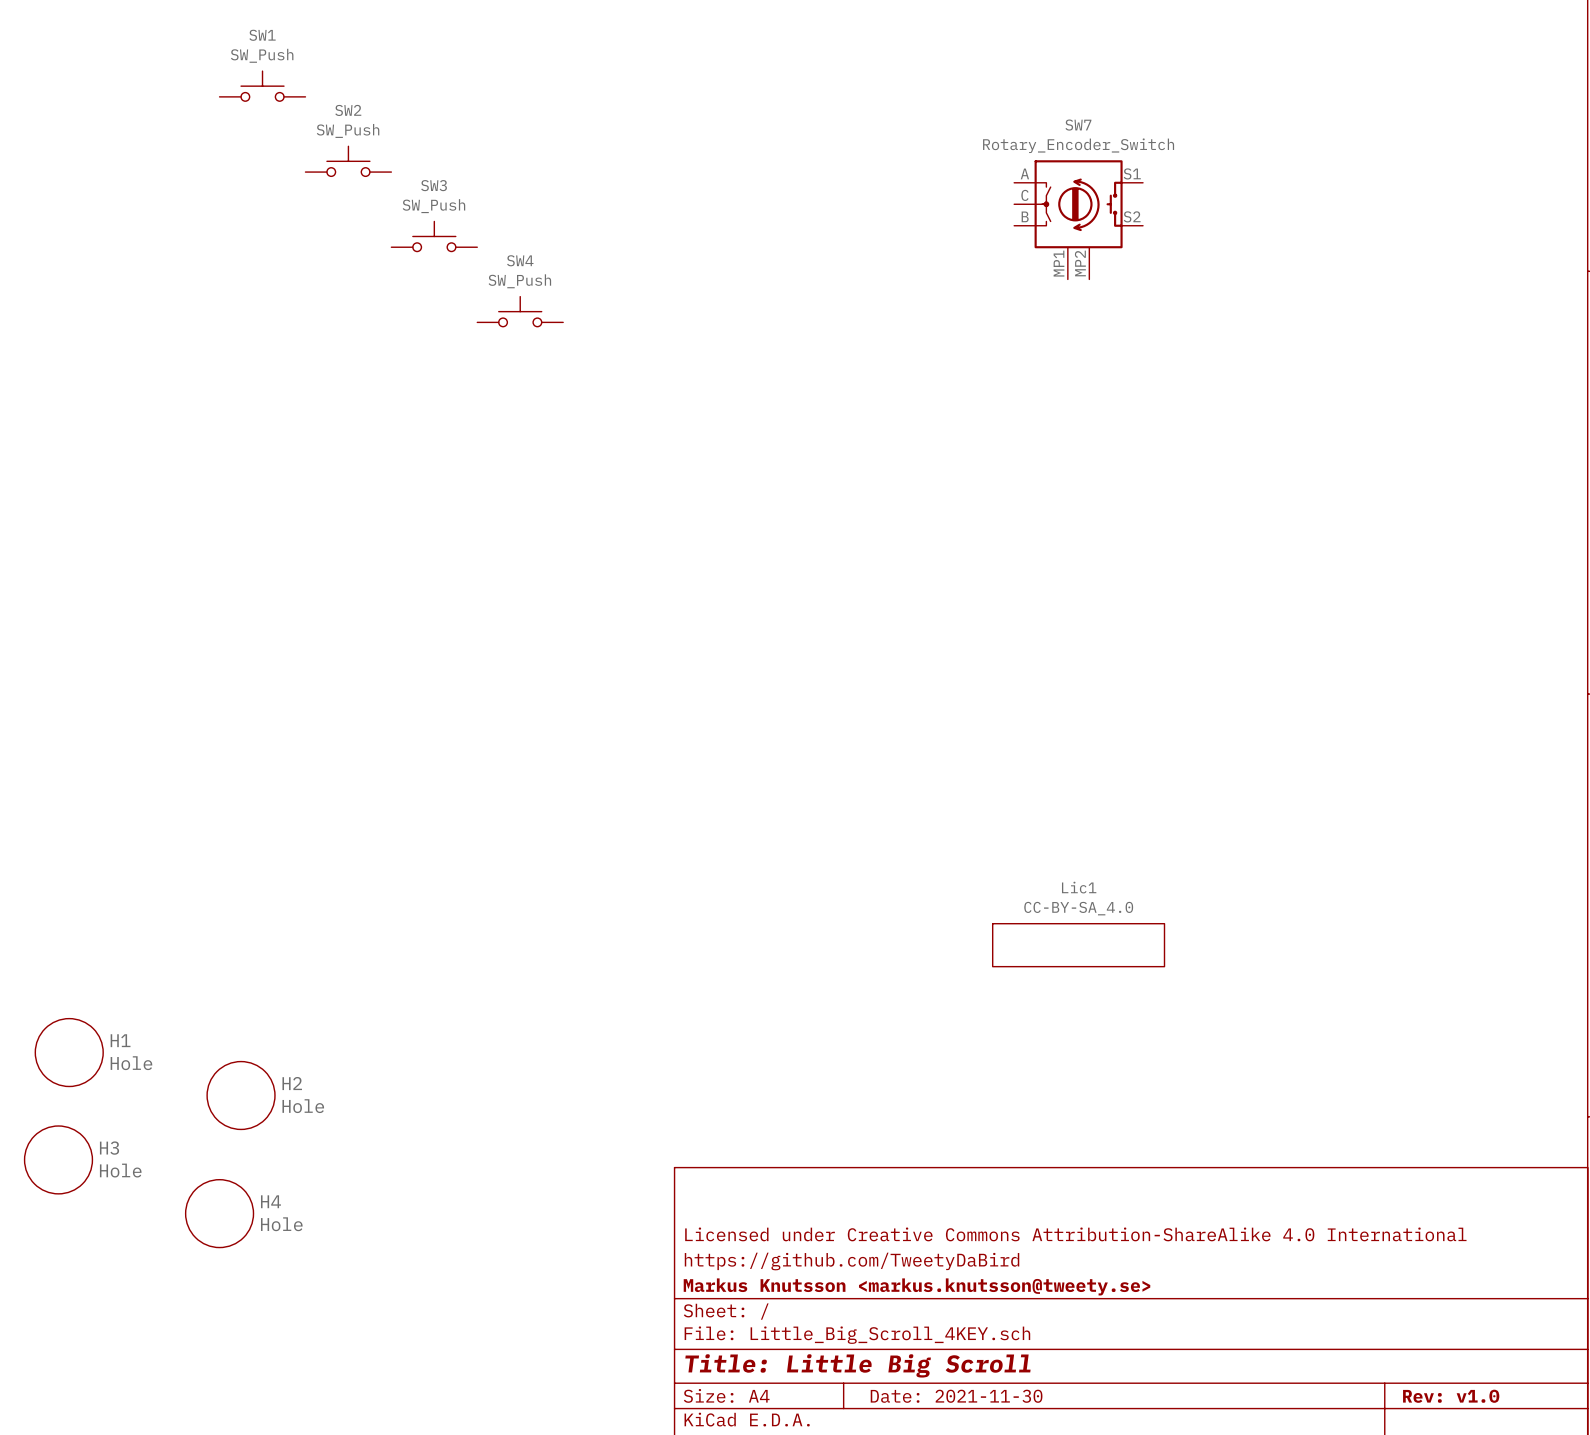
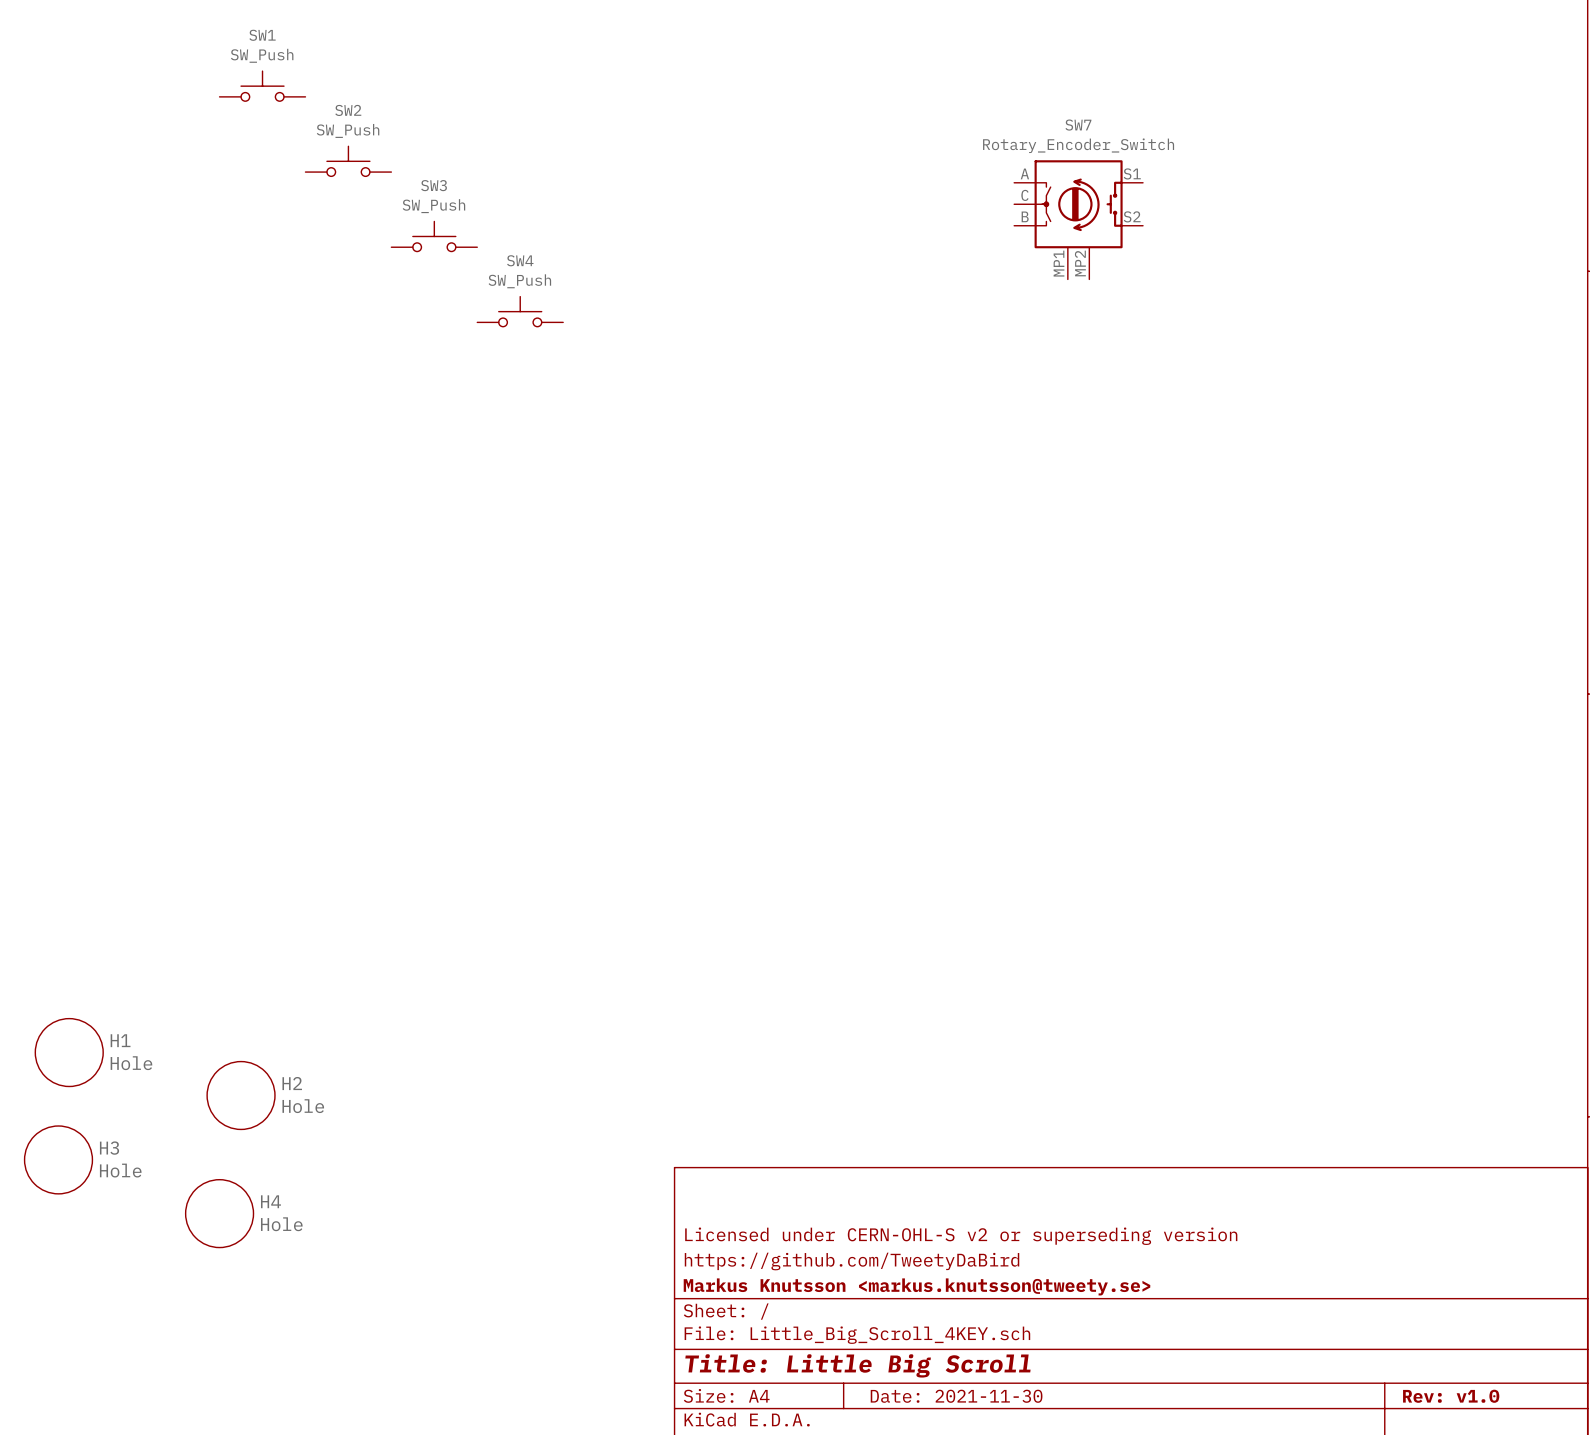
Lic1: CC-BY-SA_4.0 (1078, 945) -> none
title block: Licensed under Creative Commons Attribution-ShareAlike 4.0 International (1075, 1234) -> Licensed under CERN-OHL-S v2 or superseding version (961, 1236)

